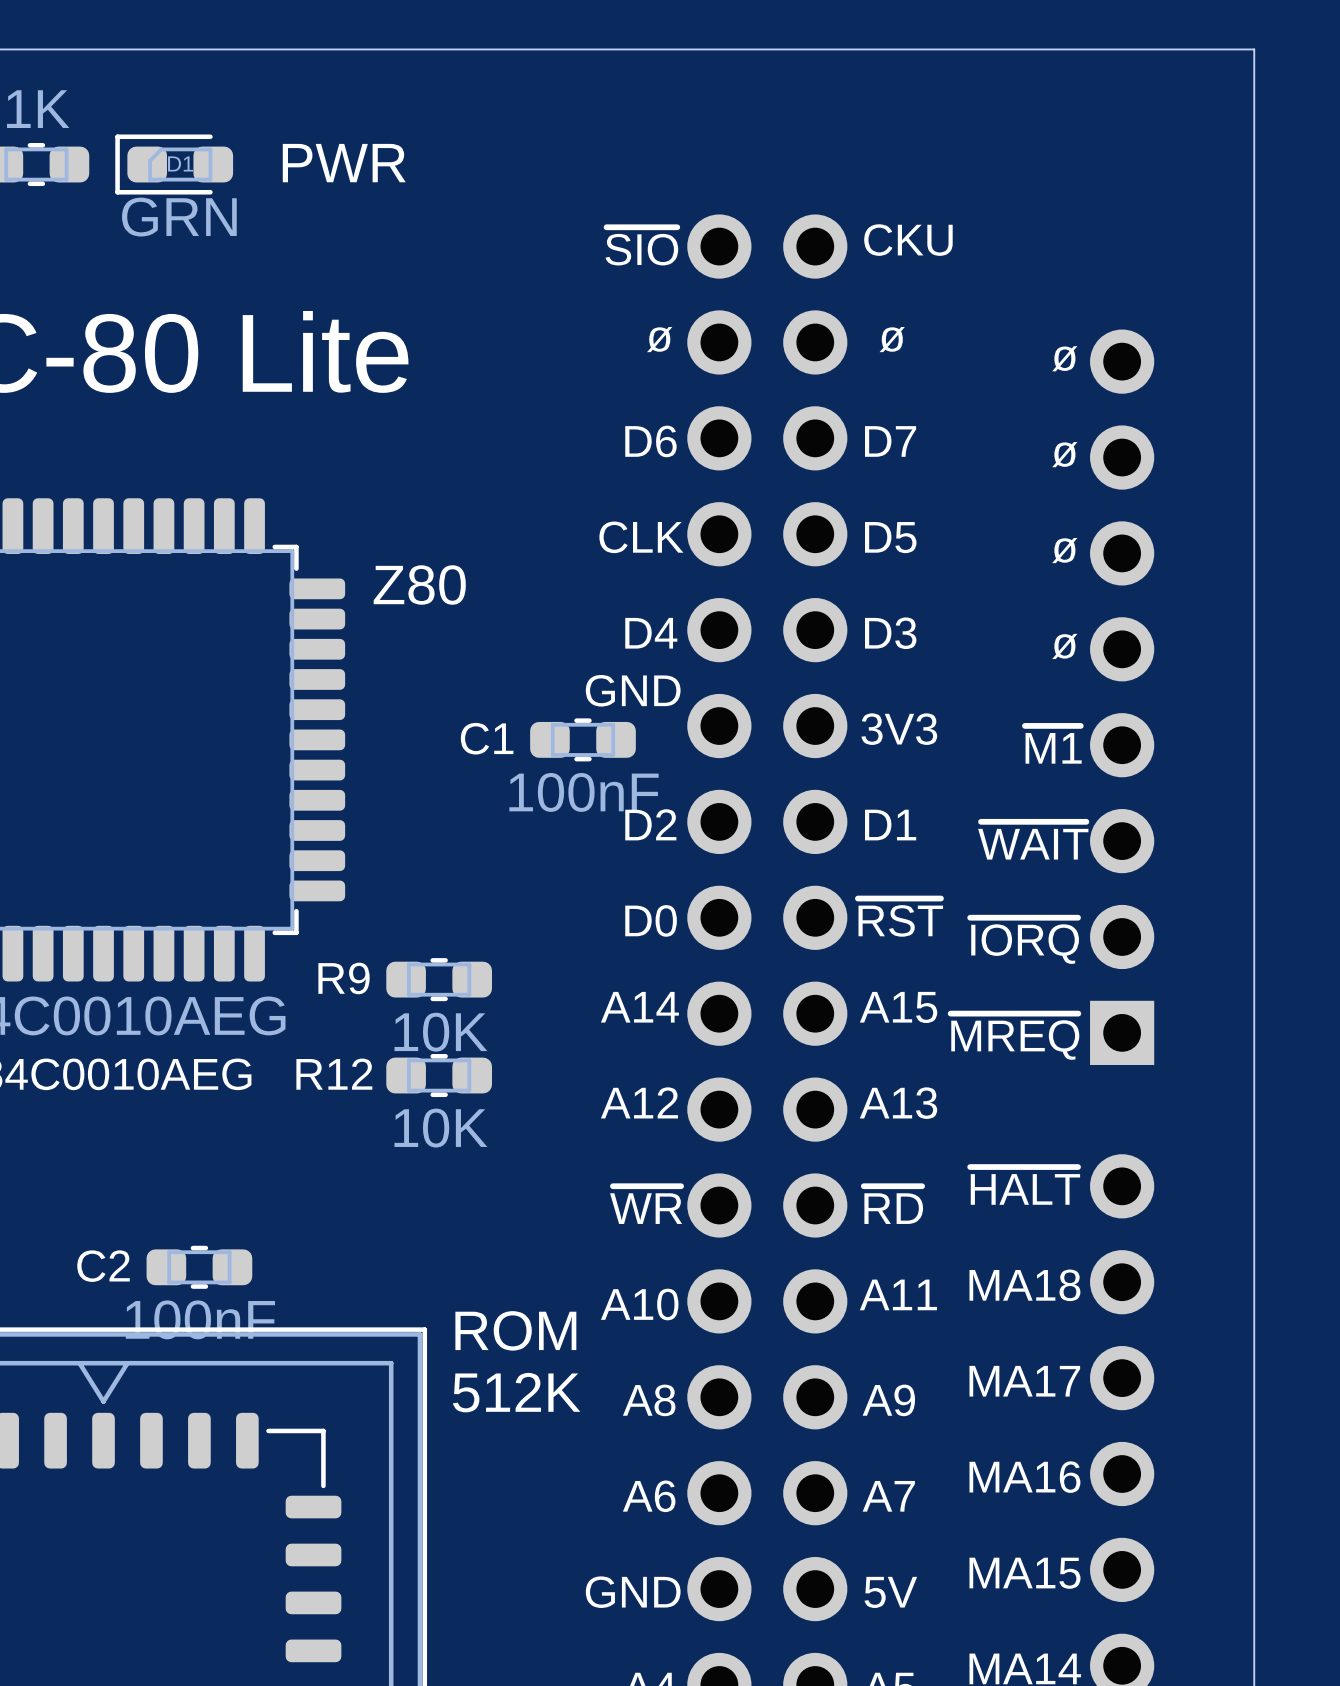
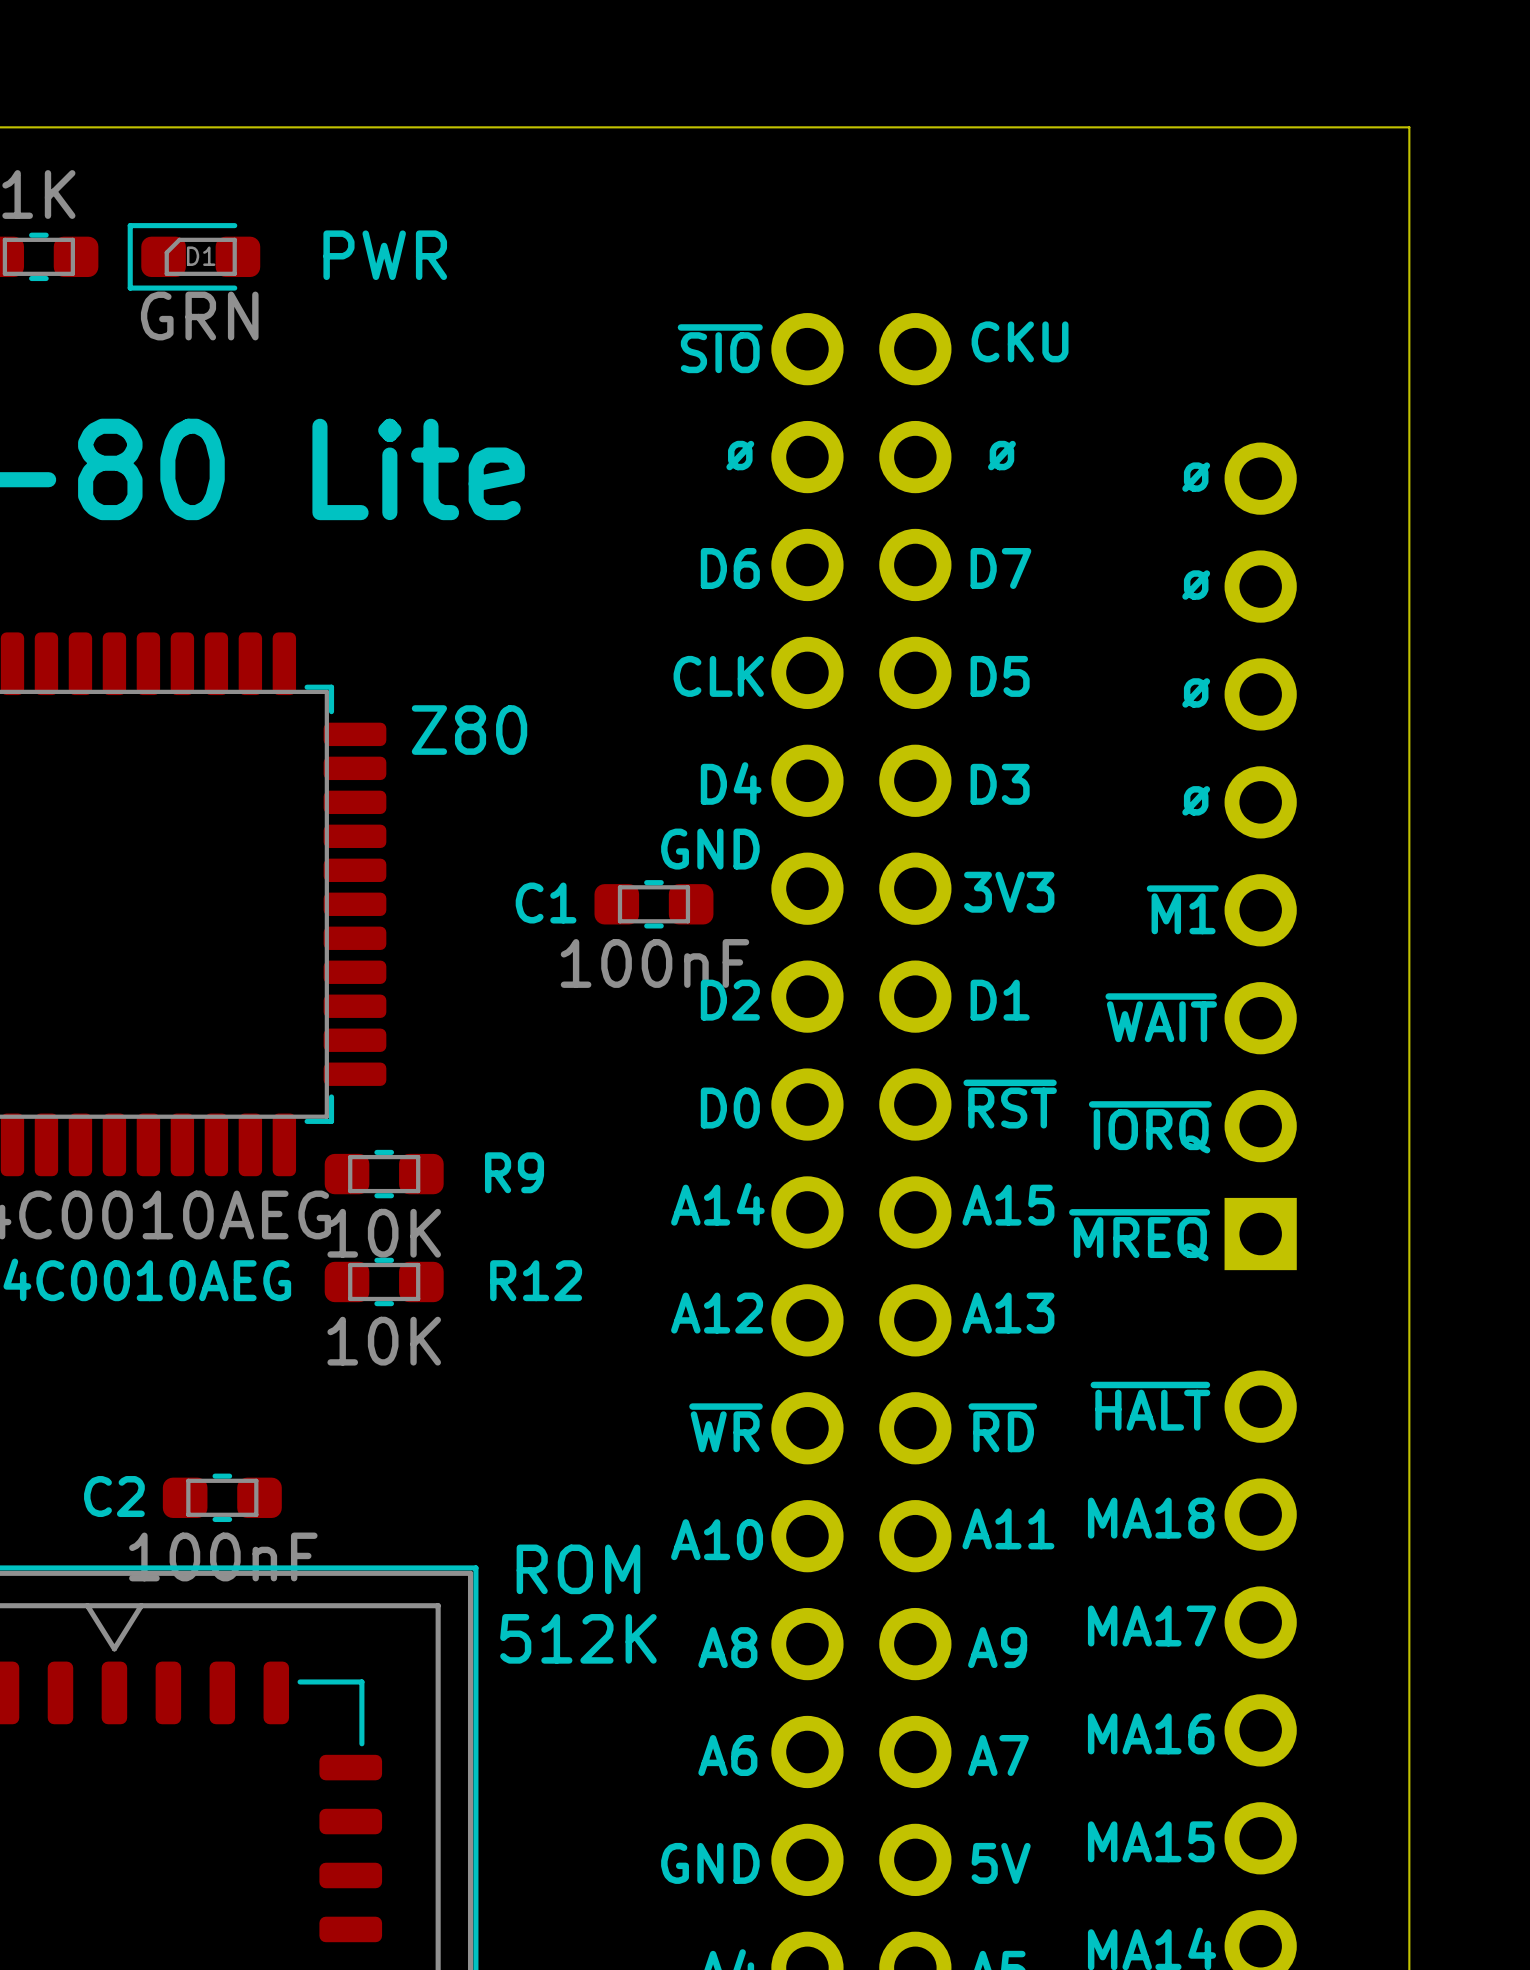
R9 name position: R9 (344, 978) -> R9 (514, 1172)
R9 position: (439, 979) -> (384, 1174)
R12 name position: R12 (334, 1074) -> R12 (536, 1280)
R12 position: (439, 1075) -> (384, 1281)

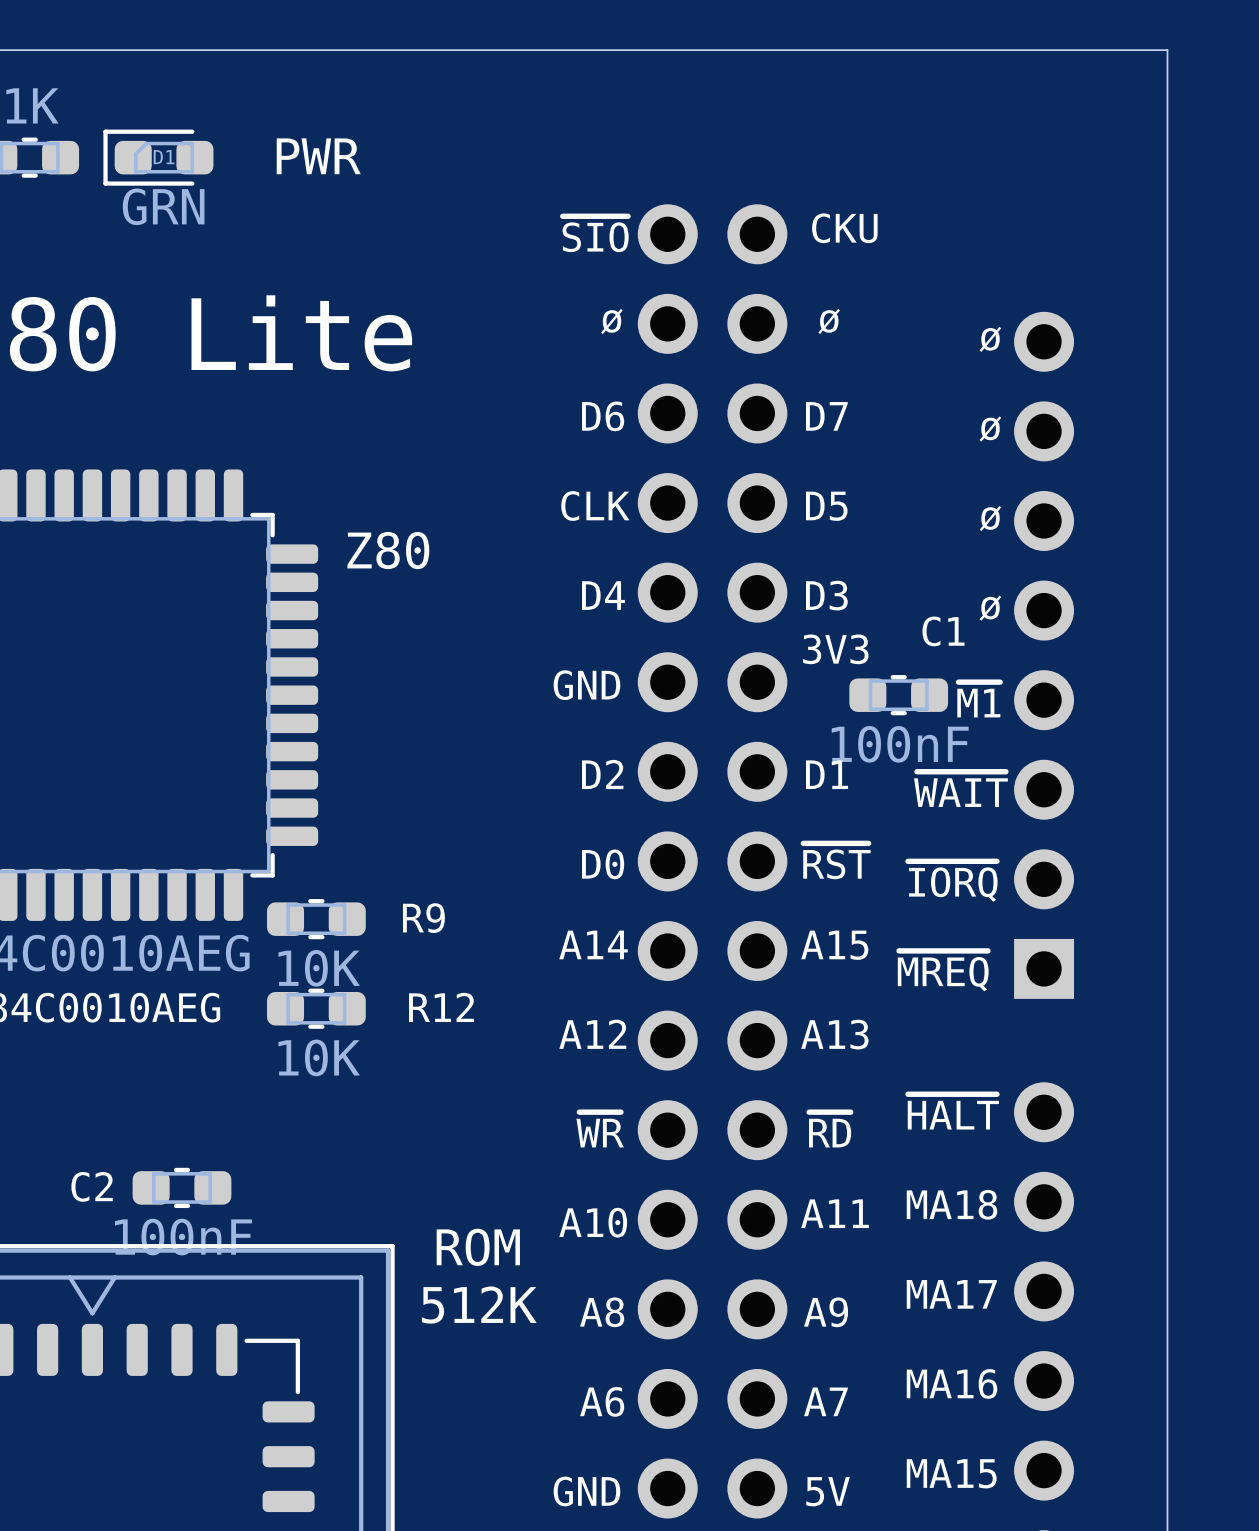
text position: GND (710, 849) -> GND (586, 685)
text position: 3V3 (1009, 892) -> 3V3 (835, 649)
C1 name position: C1 (546, 903) -> C1 (943, 631)
C1 position: (653, 904) -> (898, 695)

